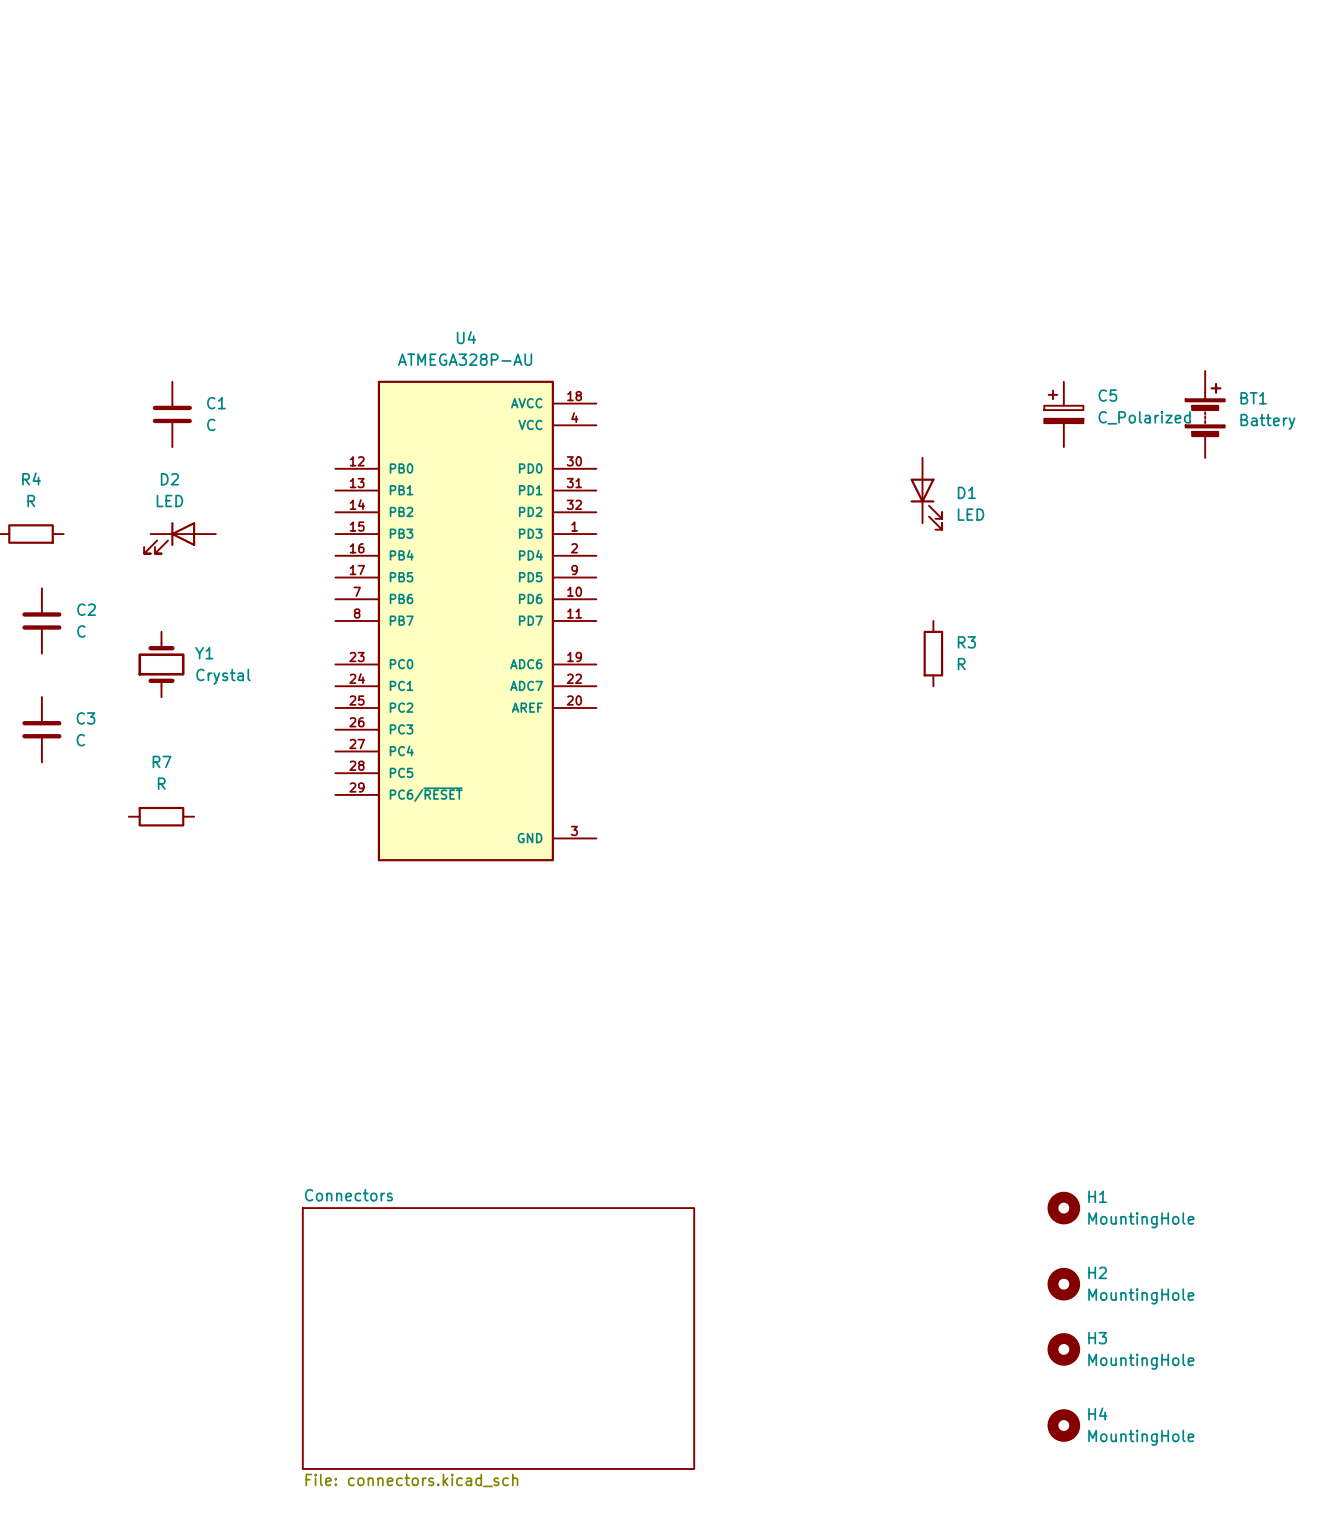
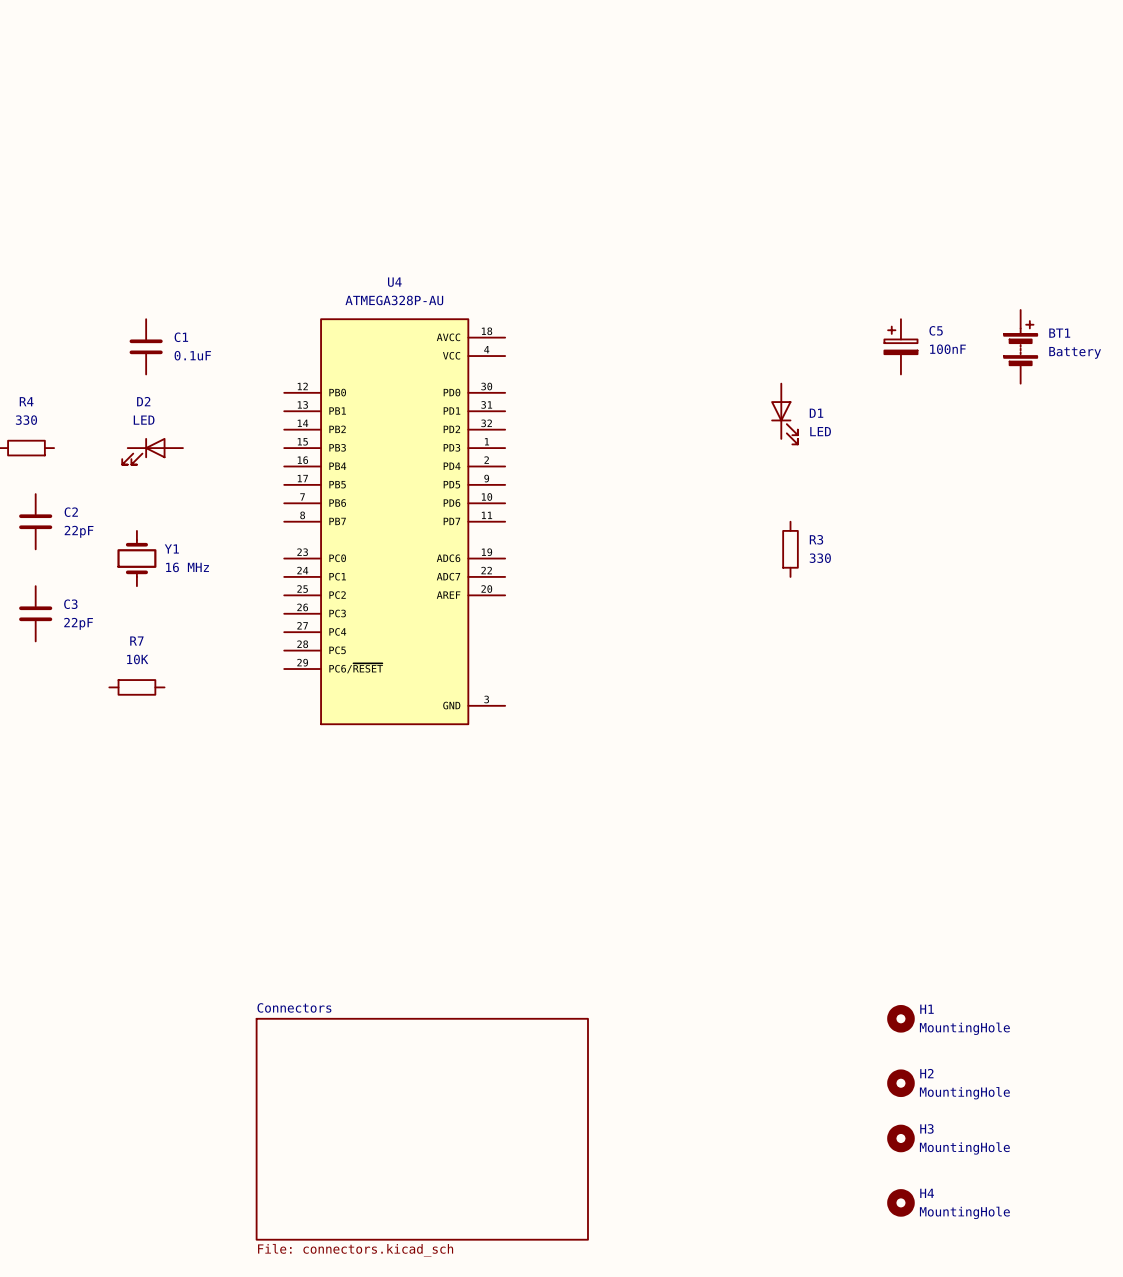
C5 value: C_Polarized (1144, 417) -> 100nF (947, 349)
C1 value: C (211, 424) -> 0.1uF (192, 355)
R4 value: R (31, 501) -> 330 (26, 420)
C2 value: C (81, 631) -> 22pF (79, 531)
R3 value: R (961, 664) -> 330 (820, 558)
Y1 value: Crystal (223, 676) -> 16 MHz (187, 567)
C3 value: C (80, 740) -> 22pF (78, 623)
R7 value: R (161, 783) -> 10K (137, 659)

